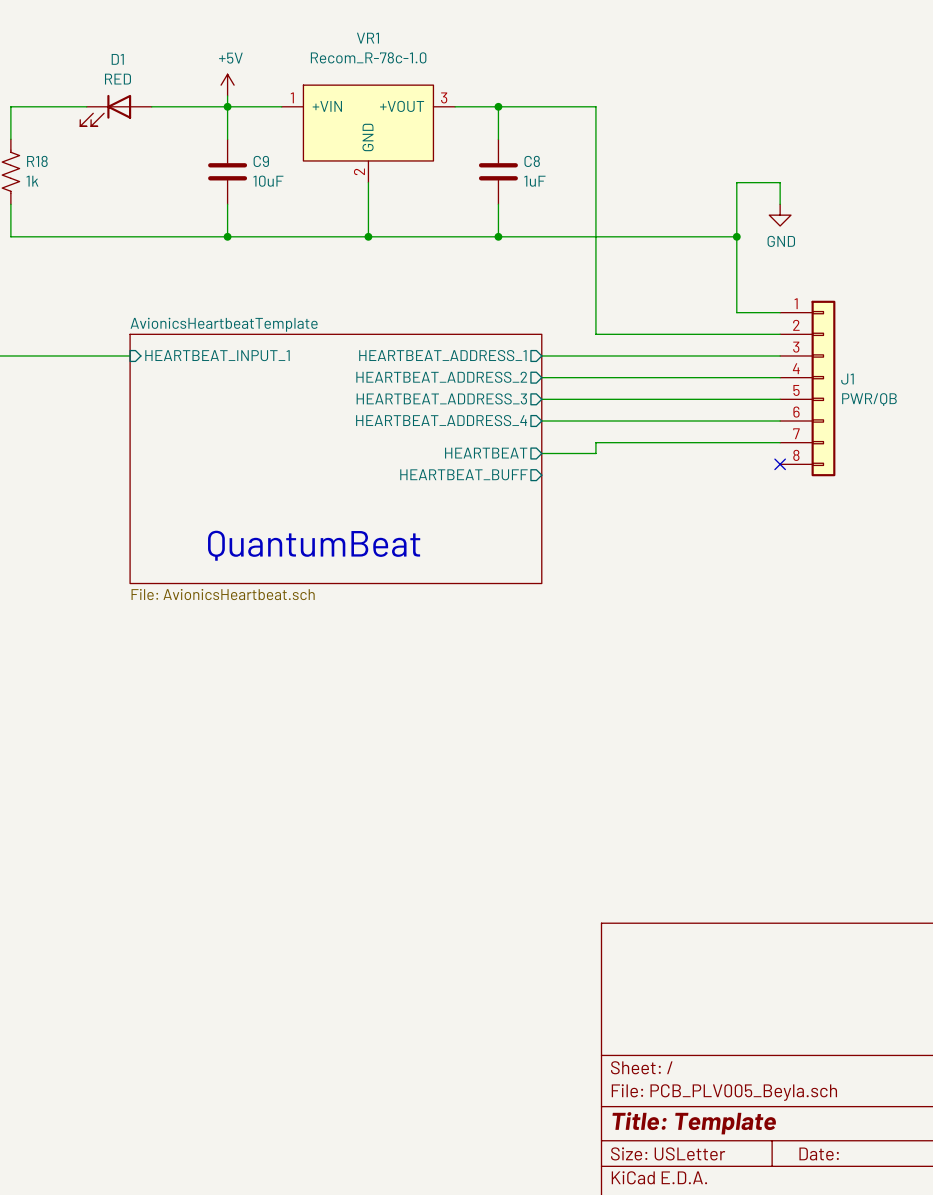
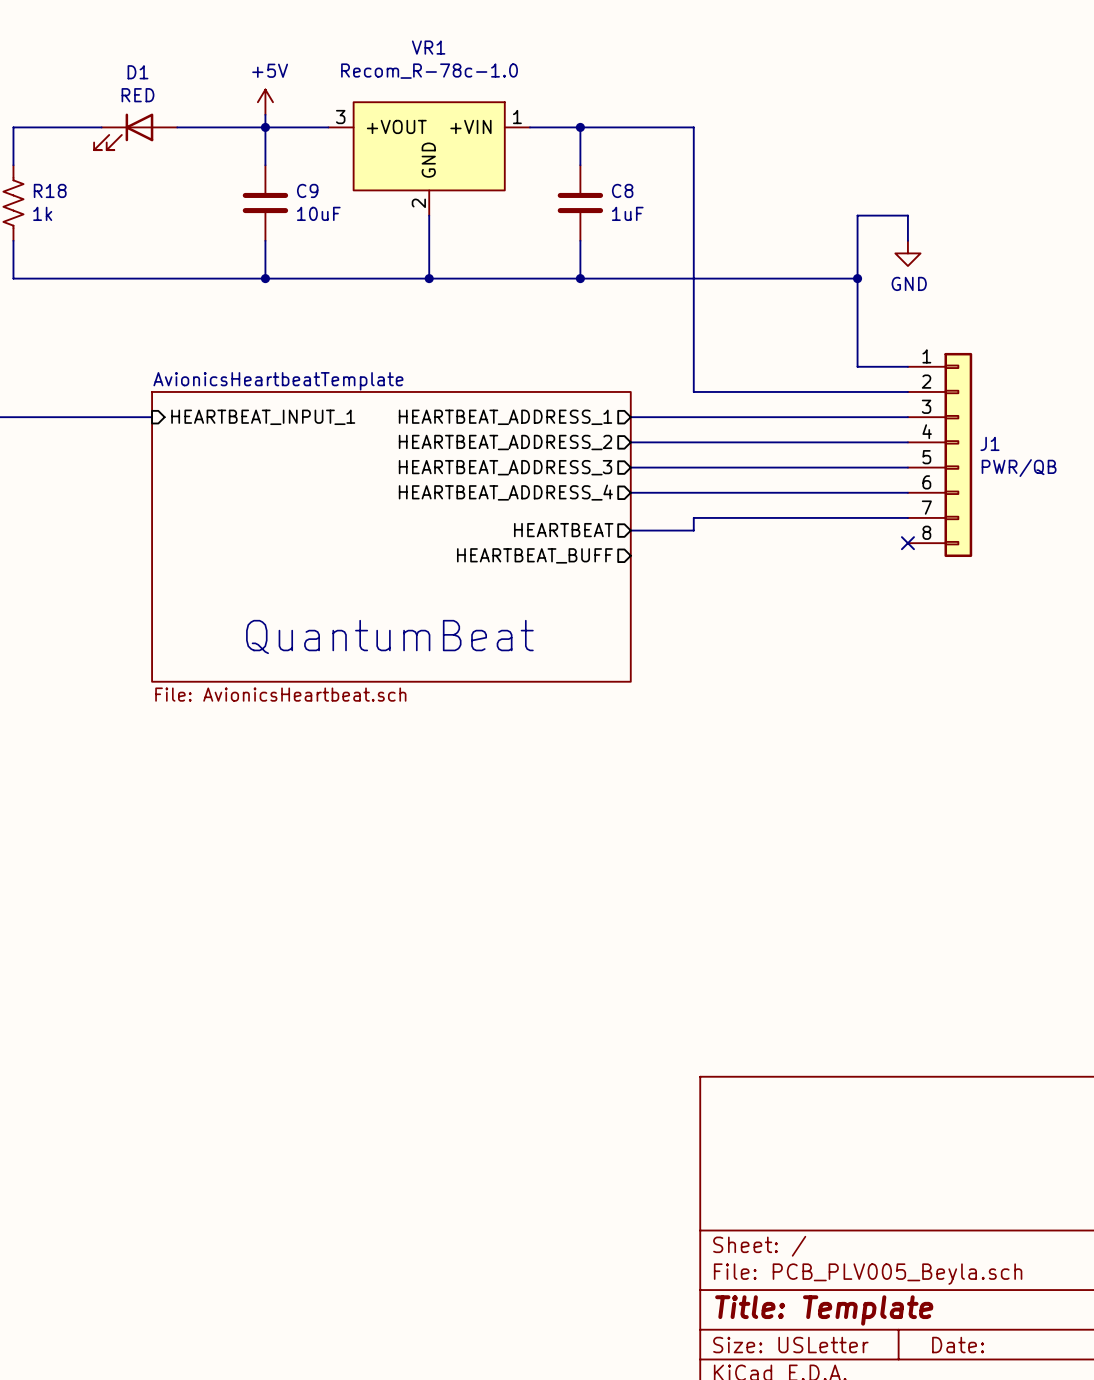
VR1 flip: as is (368, 123) -> left-right (429, 146)

